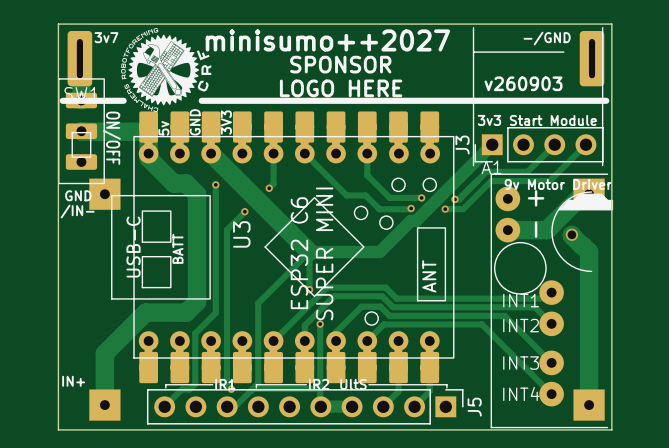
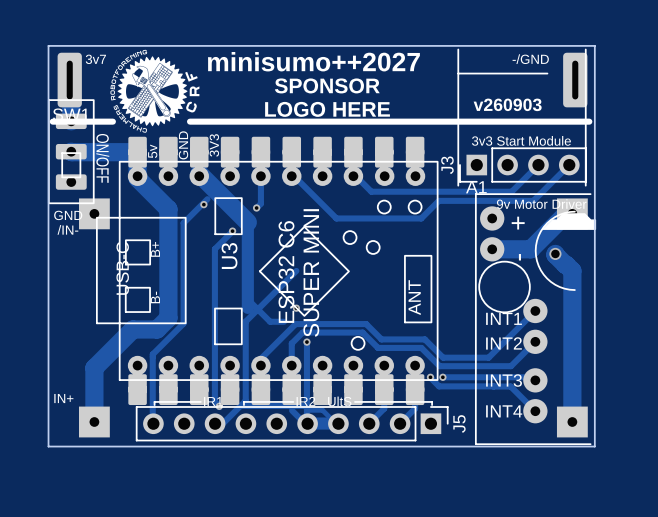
U3 footprint: [111, 111, 455, 384] -> [96, 136, 439, 406]
track: (492, 144) (416, 220) (410, 220) (379, 252) (309, 252) -> none
track: (367, 153) (367, 175) (389, 197) (421, 197) -> (353, 173) (371, 191) (471, 191)
track: (486, 171) (458, 199) -> none
track: none -> (207, 199) (183, 223) (183, 323) (152, 354) (153, 426)
track: (491, 181) (463, 209) (445, 209) -> none
track: (173, 183) (186, 183) (197, 194) (197, 301) (186, 312) (145, 312) (104, 353) -> (162, 203) (168, 209) (168, 318) (157, 329) (132, 329) (94, 368) (94, 371)
track: (215, 184) (215, 312) (195, 333) (195, 384) (189, 389) (181, 389) (164, 406) -> none
track: (346, 195) (365, 195) (379, 209) (411, 208) -> (333, 215) (336, 218) (421, 218) (438, 200) (475, 200)
via: (421, 197) -> none
via: (454, 199) -> none
track: (260, 202) (309, 252) -> (247, 222) (247, 307) (248, 300) (270, 321) (284, 321)
via: (411, 208) -> none
via: (445, 209) -> none
track: (309, 252) (309, 289) -> none
track: (545, 298) (396, 298) (385, 287) (327, 287) (308, 305) -> (529, 316) (488, 357) (443, 357) (424, 339) (381, 339) (366, 324) (295, 324)
track: (315, 314) (334, 296) (382, 296) (393, 307) (535, 307) (551, 323) -> (302, 332) (362, 332) (378, 347) (421, 347) (439, 366) (511, 366) (535, 341)
track: (336, 341) (336, 332) (361, 306) (380, 306) (389, 315) (504, 315) (551, 362) -> none
track: (367, 345) (367, 341) (383, 324) (481, 324) (526, 369) -> (493, 386) (510, 386)
via: none -> (430, 377)
track: none -> (442, 377) (532, 377)
via: none -> (442, 377)
track: none -> (431, 377) (439, 386) (493, 386)
track: none -> (292, 410) (307, 426)
track: none -> (306, 410) (322, 410) (338, 426)

